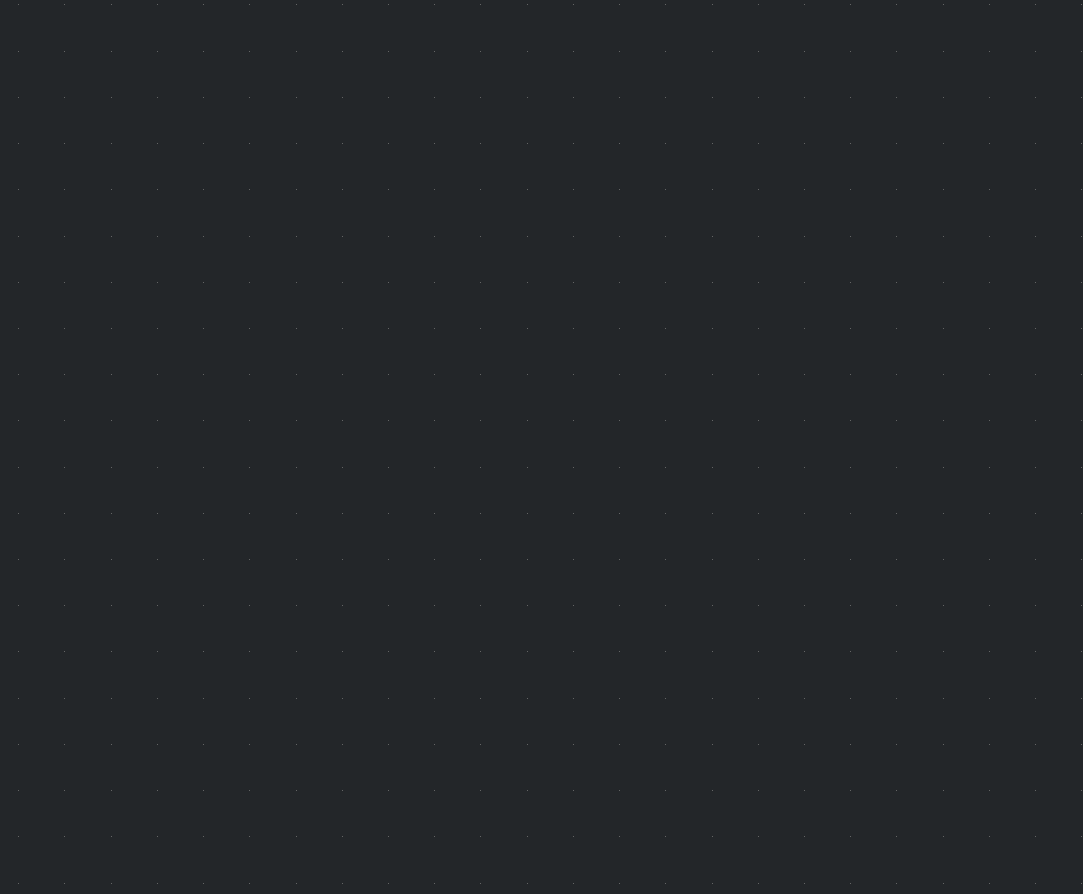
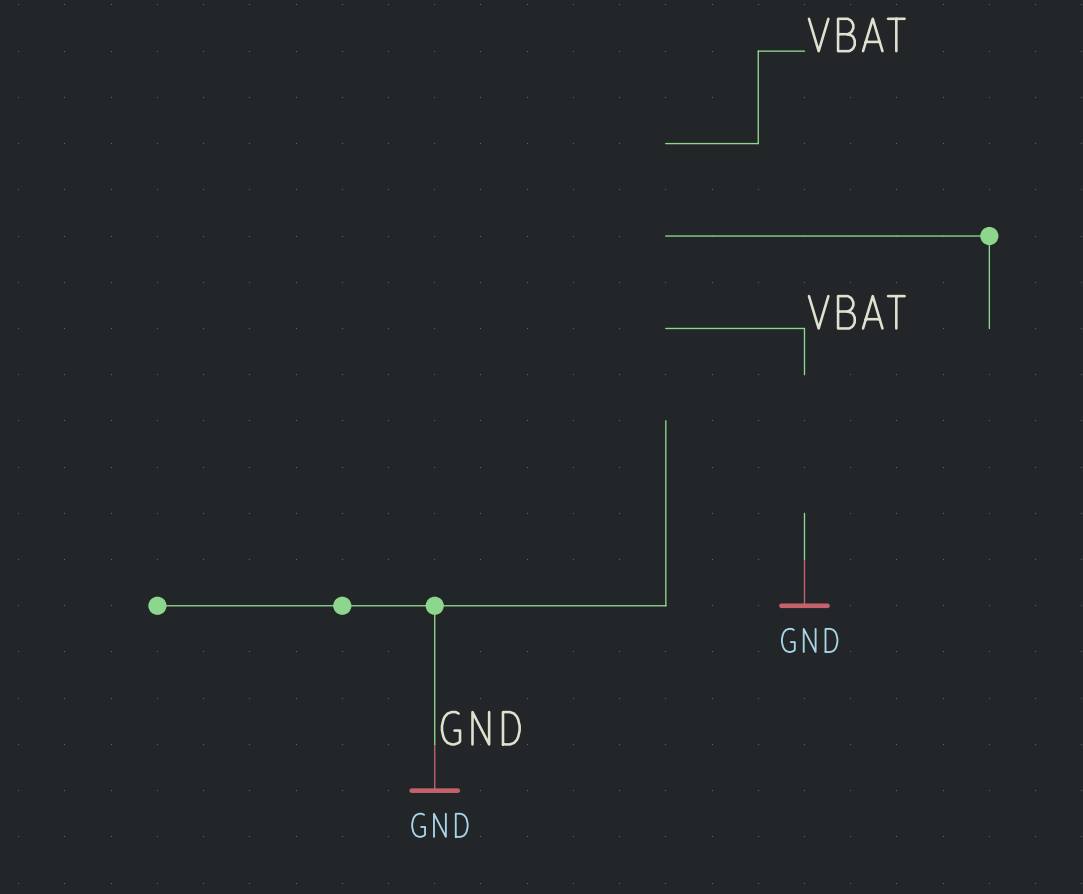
label: none -> VBAT (856, 34)
wire: none -> (804, 51) (758, 51) (758, 143) (665, 143)
wire: none -> (665, 236) (989, 236) (989, 328)
junction: none -> (989, 236)
label: none -> VBAT (856, 312)
wire: none -> (665, 328) (804, 328) (804, 374)
wire: none -> (665, 420) (665, 605) (157, 605)
wire: none -> (804, 513) (804, 559)
power symbol: none -> GND (804, 583)
junction: none -> (157, 605)
junction: none -> (342, 605)
wire: none -> (434, 605) (434, 744)
junction: none -> (434, 605)
label: none -> GND (480, 728)
power symbol: none -> GND (434, 768)

